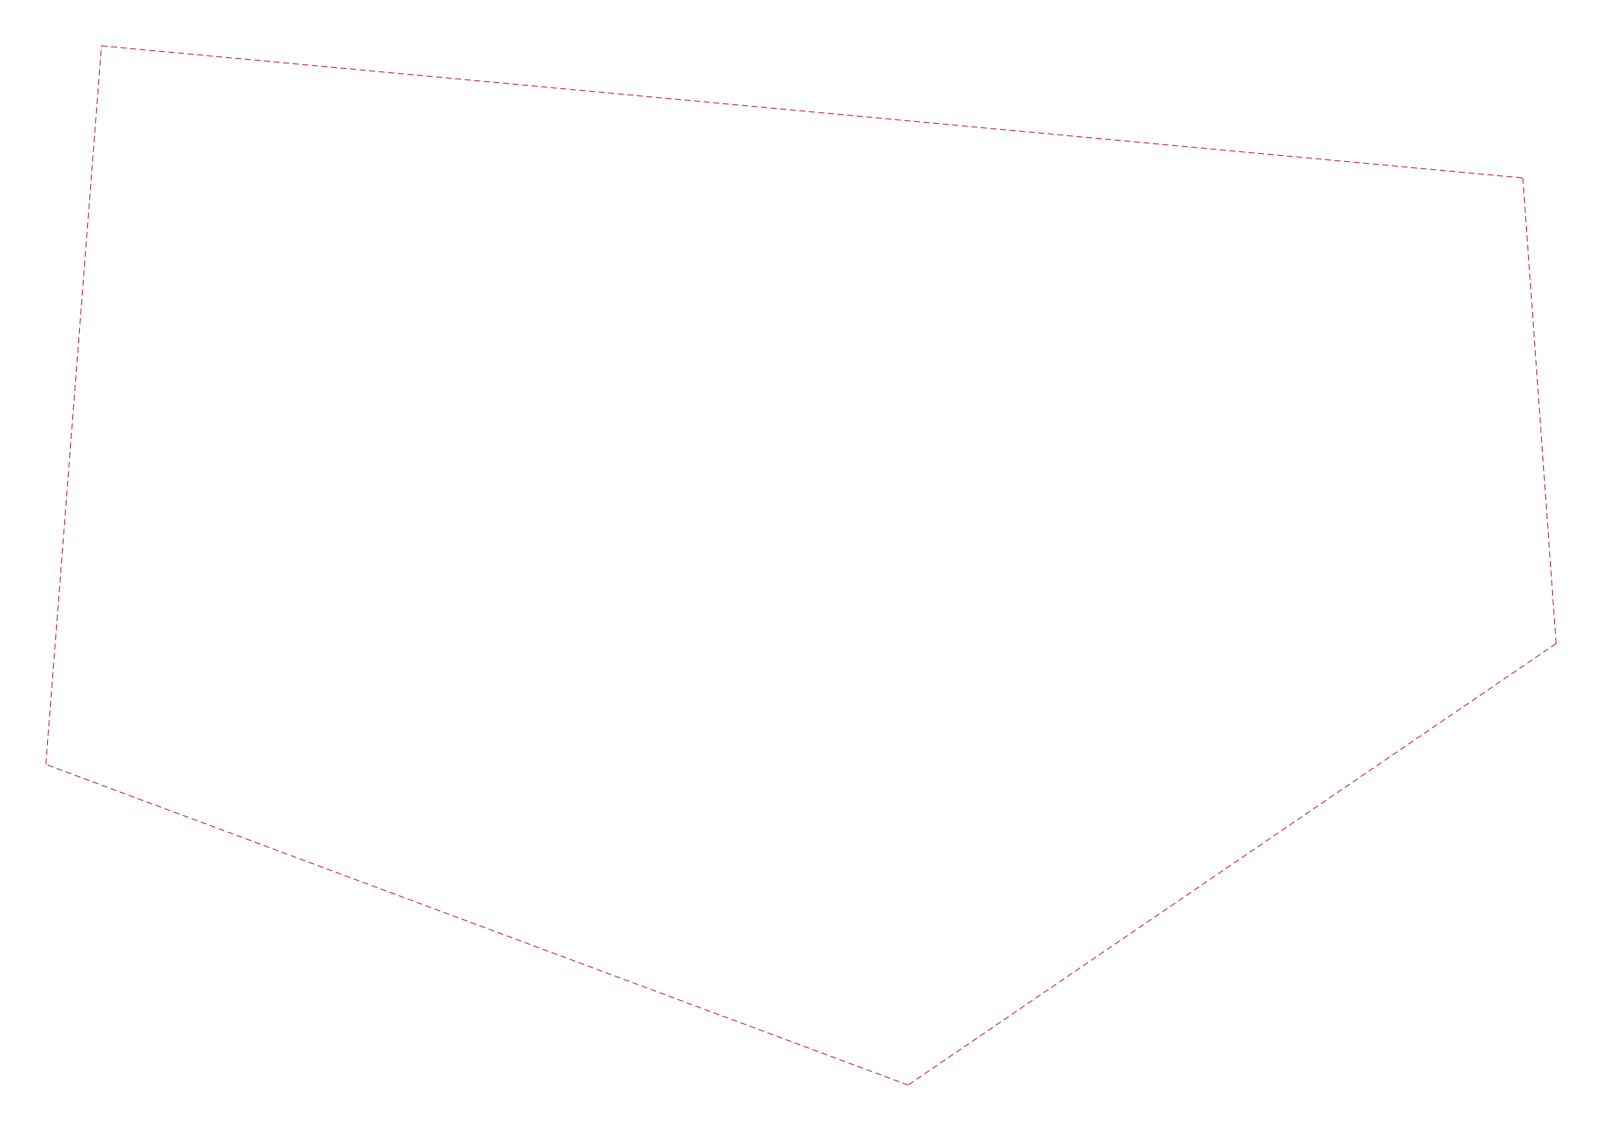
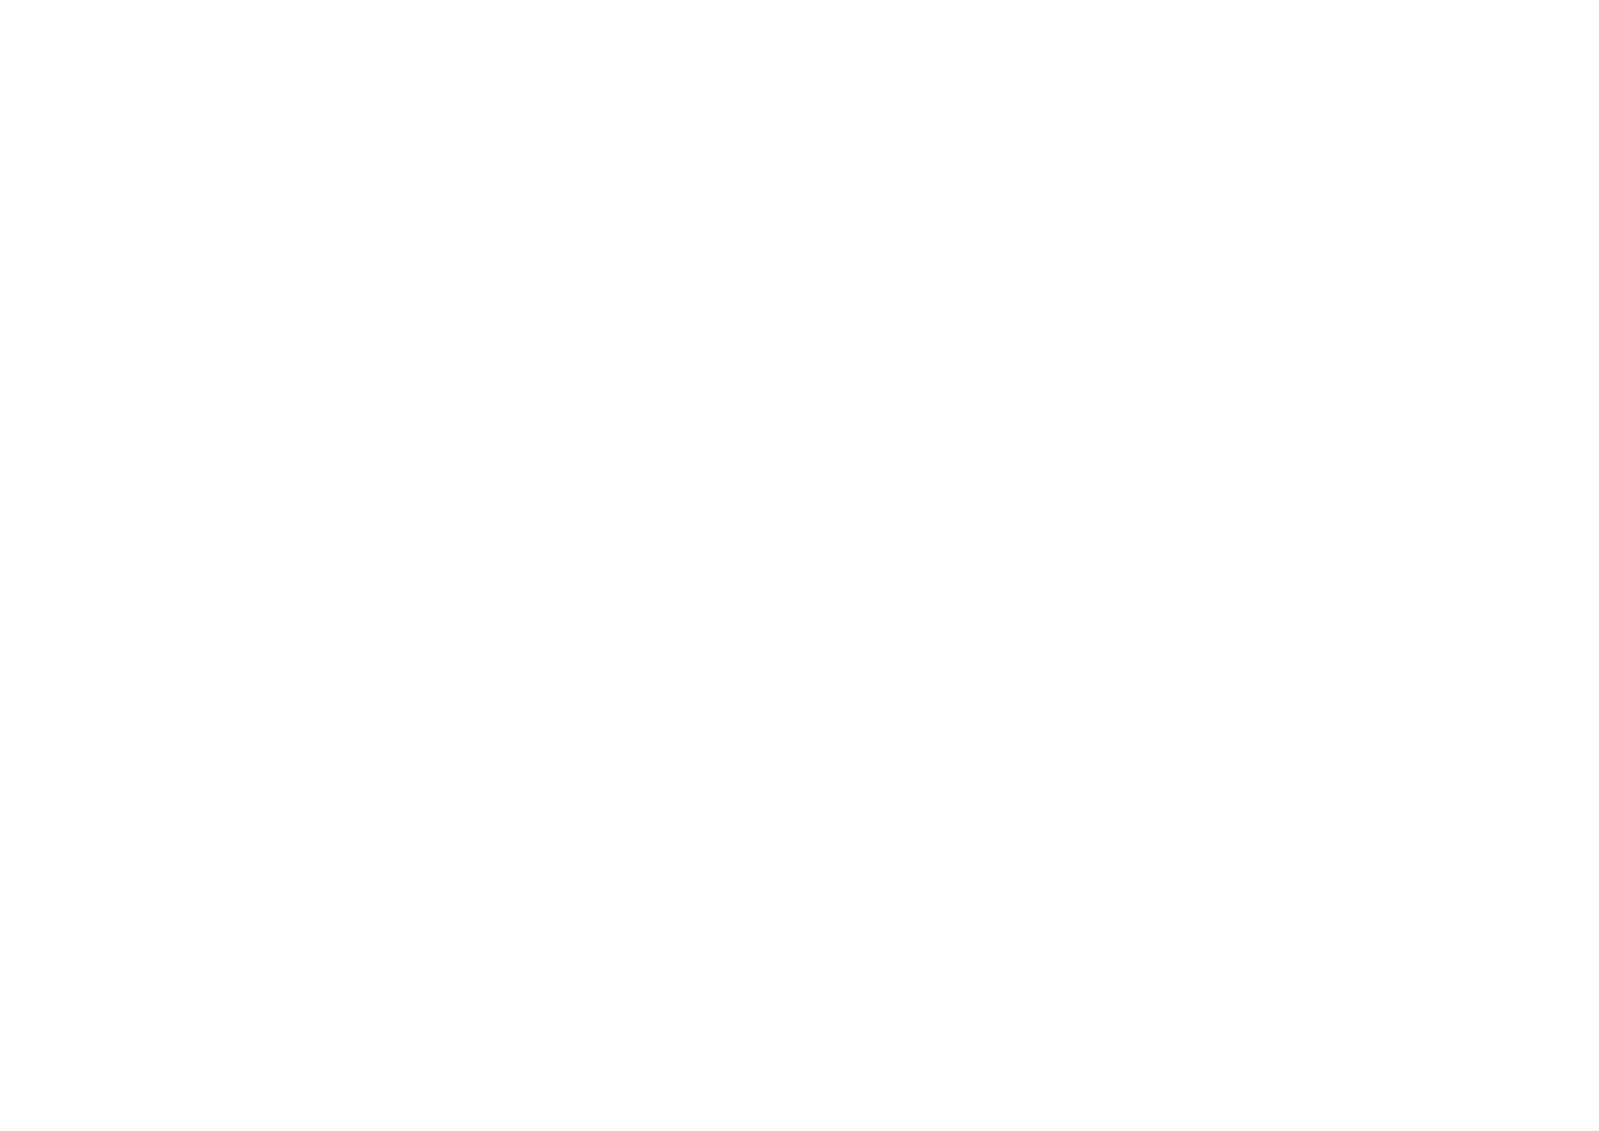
zone outline: (101, 45) (45, 764) (908, 1085) (1556, 643) (1522, 177) (101, 45) -> none

